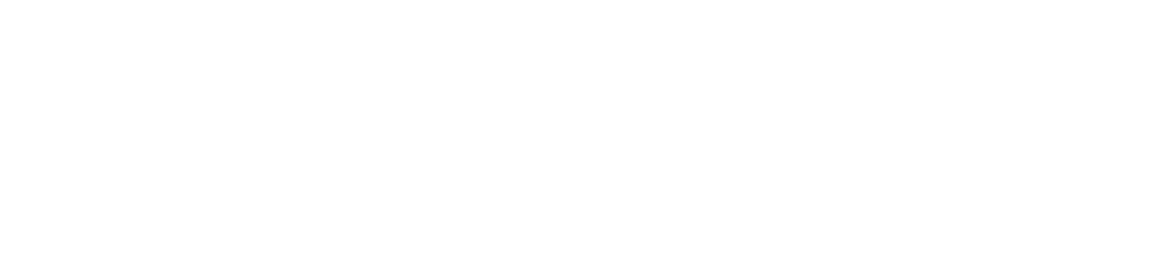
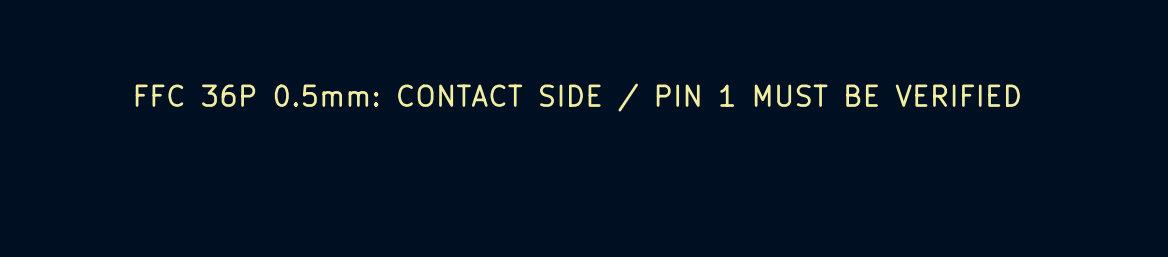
text: none -> FFC 36P 0.5mm: CONTACT SIDE / PIN 1 MUST BE VERIFIED (577, 97)

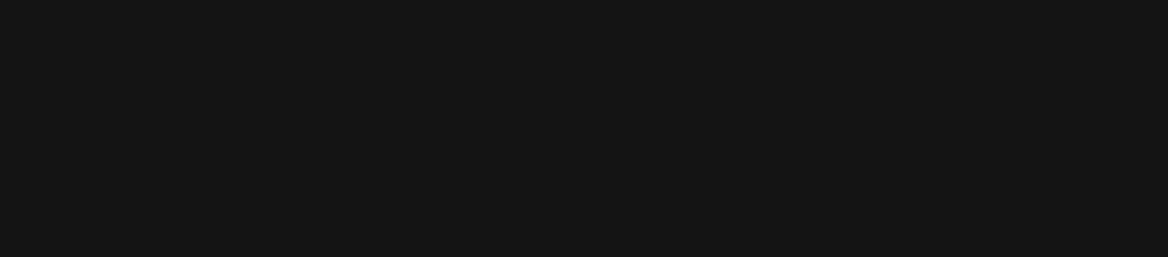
text: FFC 36P 0.5mm: CONTACT SIDE / PIN 1 MUST BE VERIFIED (577, 97) -> none

